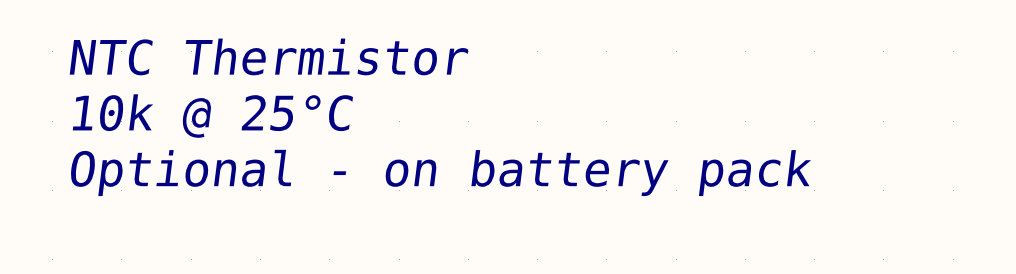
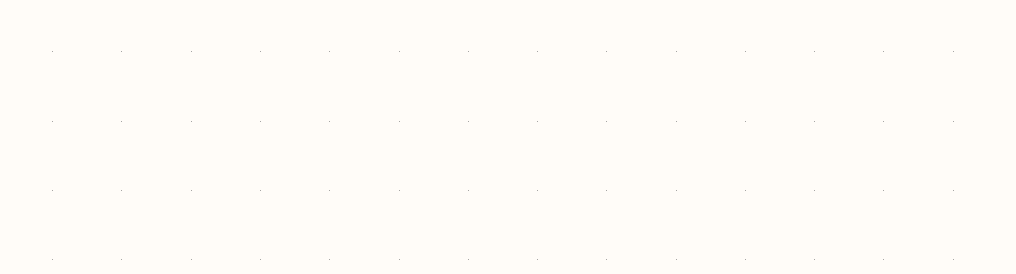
text: NTC Thermistor (268, 56) -> none
text: 10k @ 25°C (212, 116) -> none
text: Optional - on battery pack (440, 172) -> none

